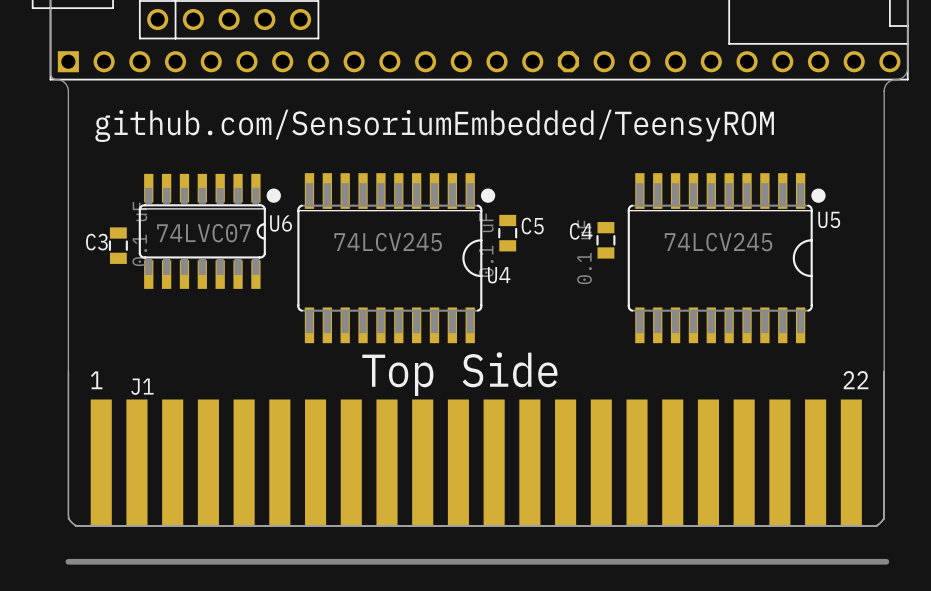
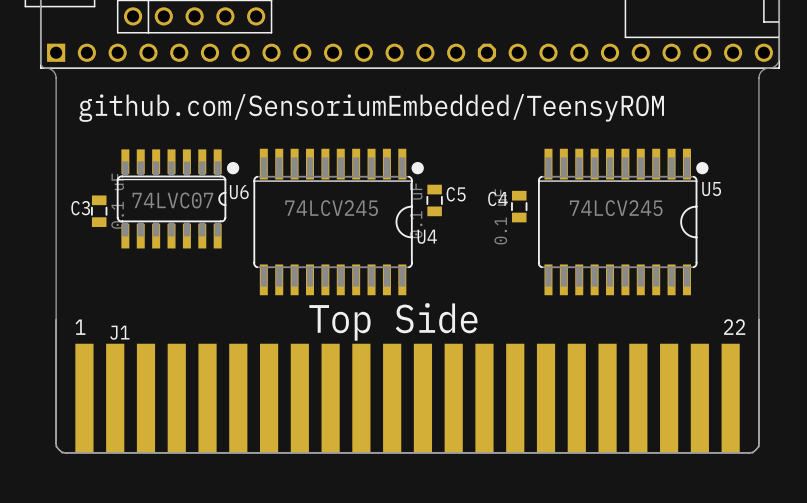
line: (68, 561) (886, 561) -> none

